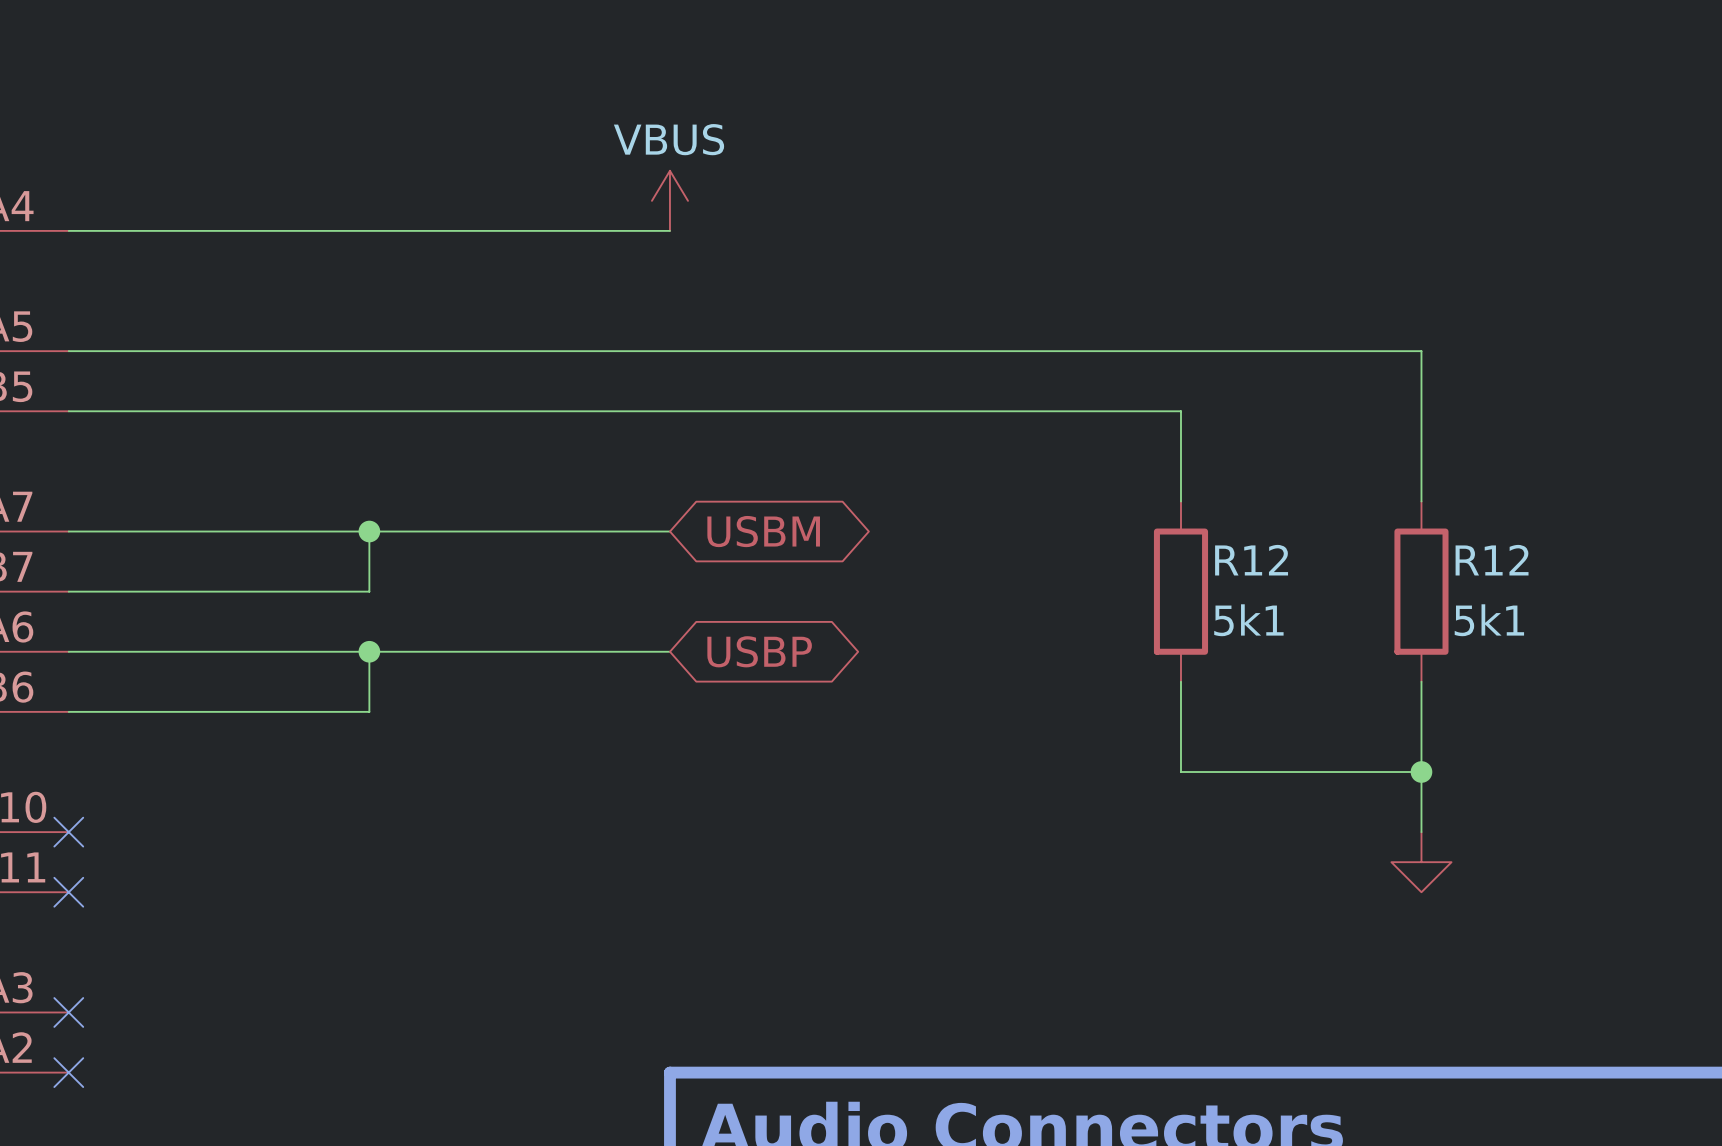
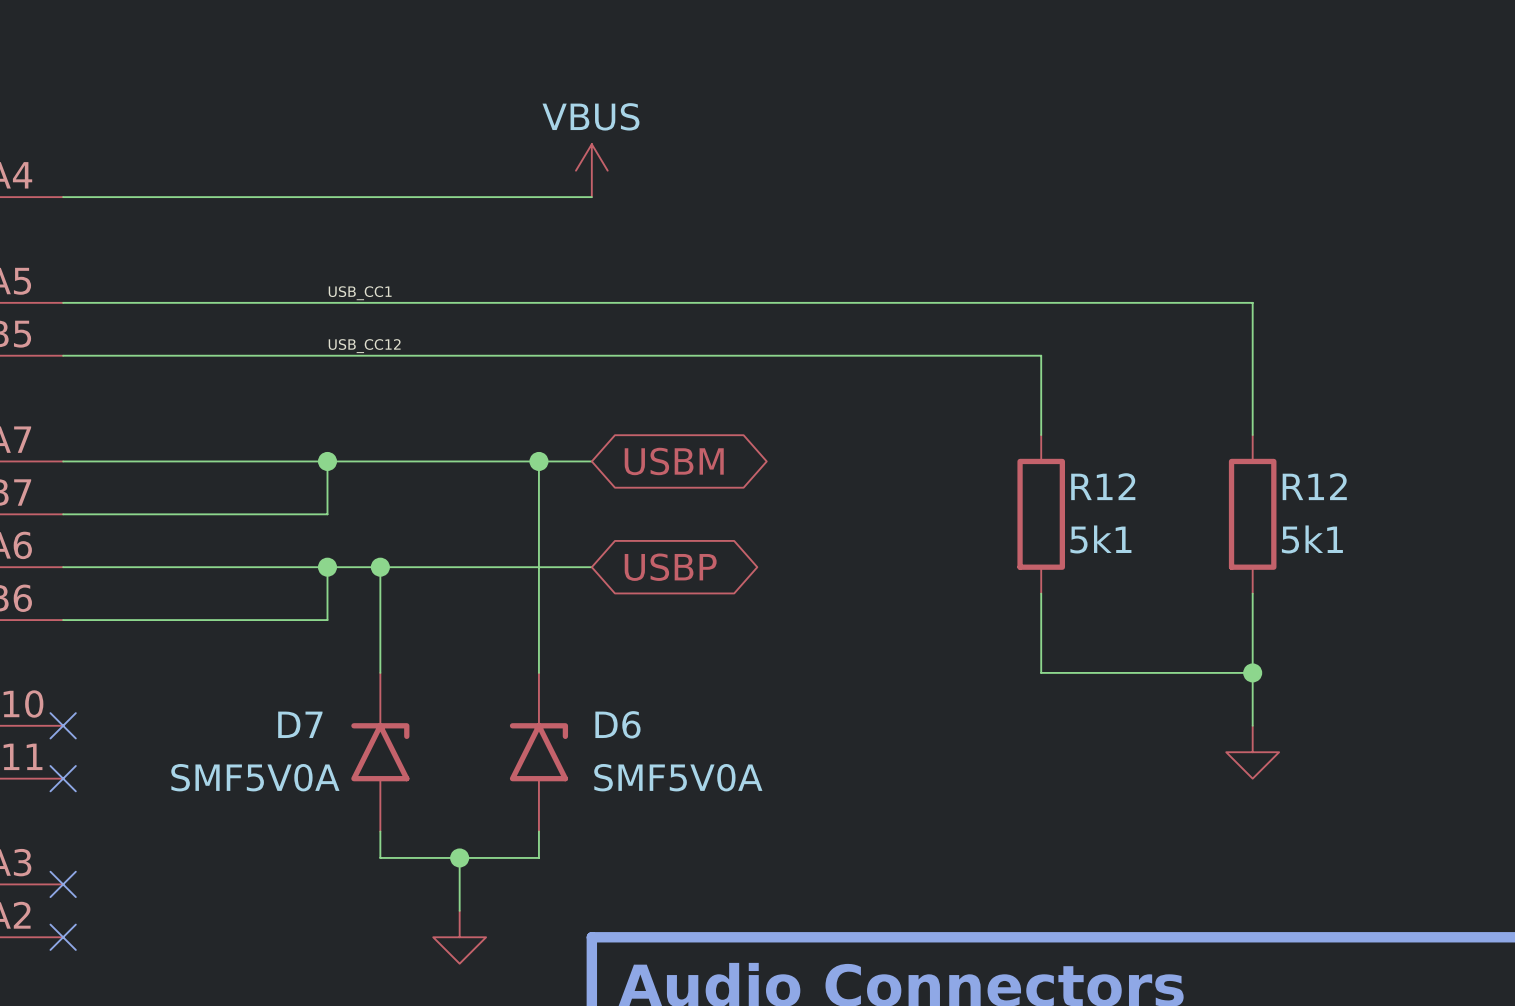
label: none -> USB_CC1 (360, 293)
label: none -> USB_CC12 (364, 346)
wire: none -> (538, 461) (538, 672)
junction: none -> (538, 461)
wire: none -> (380, 567) (380, 672)
junction: none -> (380, 567)
D7: none -> SMF5V0A (380, 752)
D6: none -> SMF5V0A (538, 752)
wire: none -> (380, 831) (380, 857) (538, 857) (538, 831)
wire: none -> (459, 857) (459, 910)
junction: none -> (459, 857)
power symbol: none -> (459, 937)

